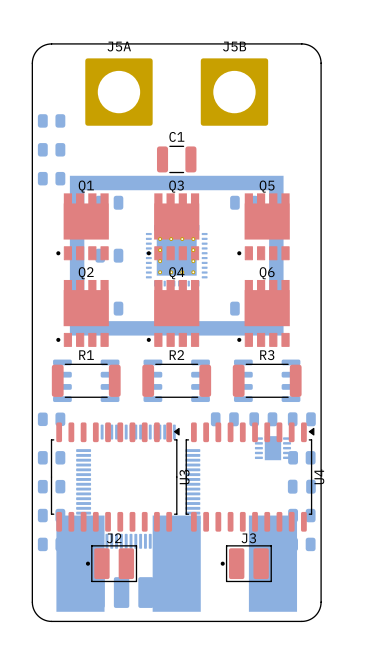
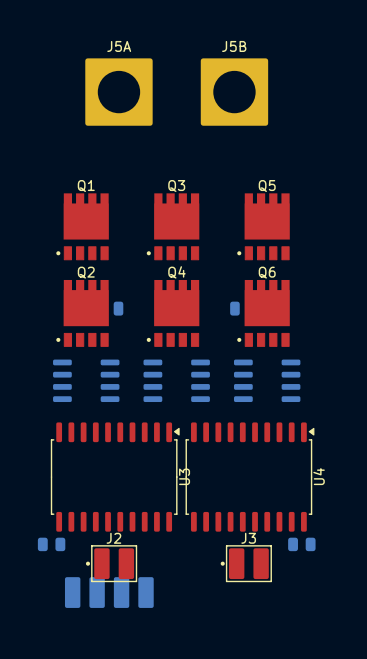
board edge: (51, 43) (301, 43) (312, 46) (319, 54) (321, 63) (321, 602) (318, 612) (310, 619) (301, 621) (51, 621) (41, 618) (34, 610) (32, 602) (32, 63) (37, 49) (51, 43) -> none
part: (51, 120) -> none
part: (51, 149) -> none
C1: (176, 159) -> none
part: (51, 178) -> none
part: (109, 202) -> none
part: (244, 202) -> none
part: (109, 255) -> none
part: (176, 255) -> none
part: (176, 255) -> none
R1: (86, 380) -> none
R2: (176, 380) -> none
R3: (267, 380) -> none
part: (51, 419) -> none
part: (224, 419) -> none
part: (263, 419) -> none
part: (301, 419) -> none
part: (272, 448) -> none
part: (51, 457) -> none
part: (301, 457) -> none
part: (51, 486) -> none
part: (138, 486) -> none
part: (301, 486) -> none
part: (51, 515) -> none
part: (301, 515) -> none
part: (80, 563) -> none
part: (176, 563) -> none
part: (272, 563) -> none

